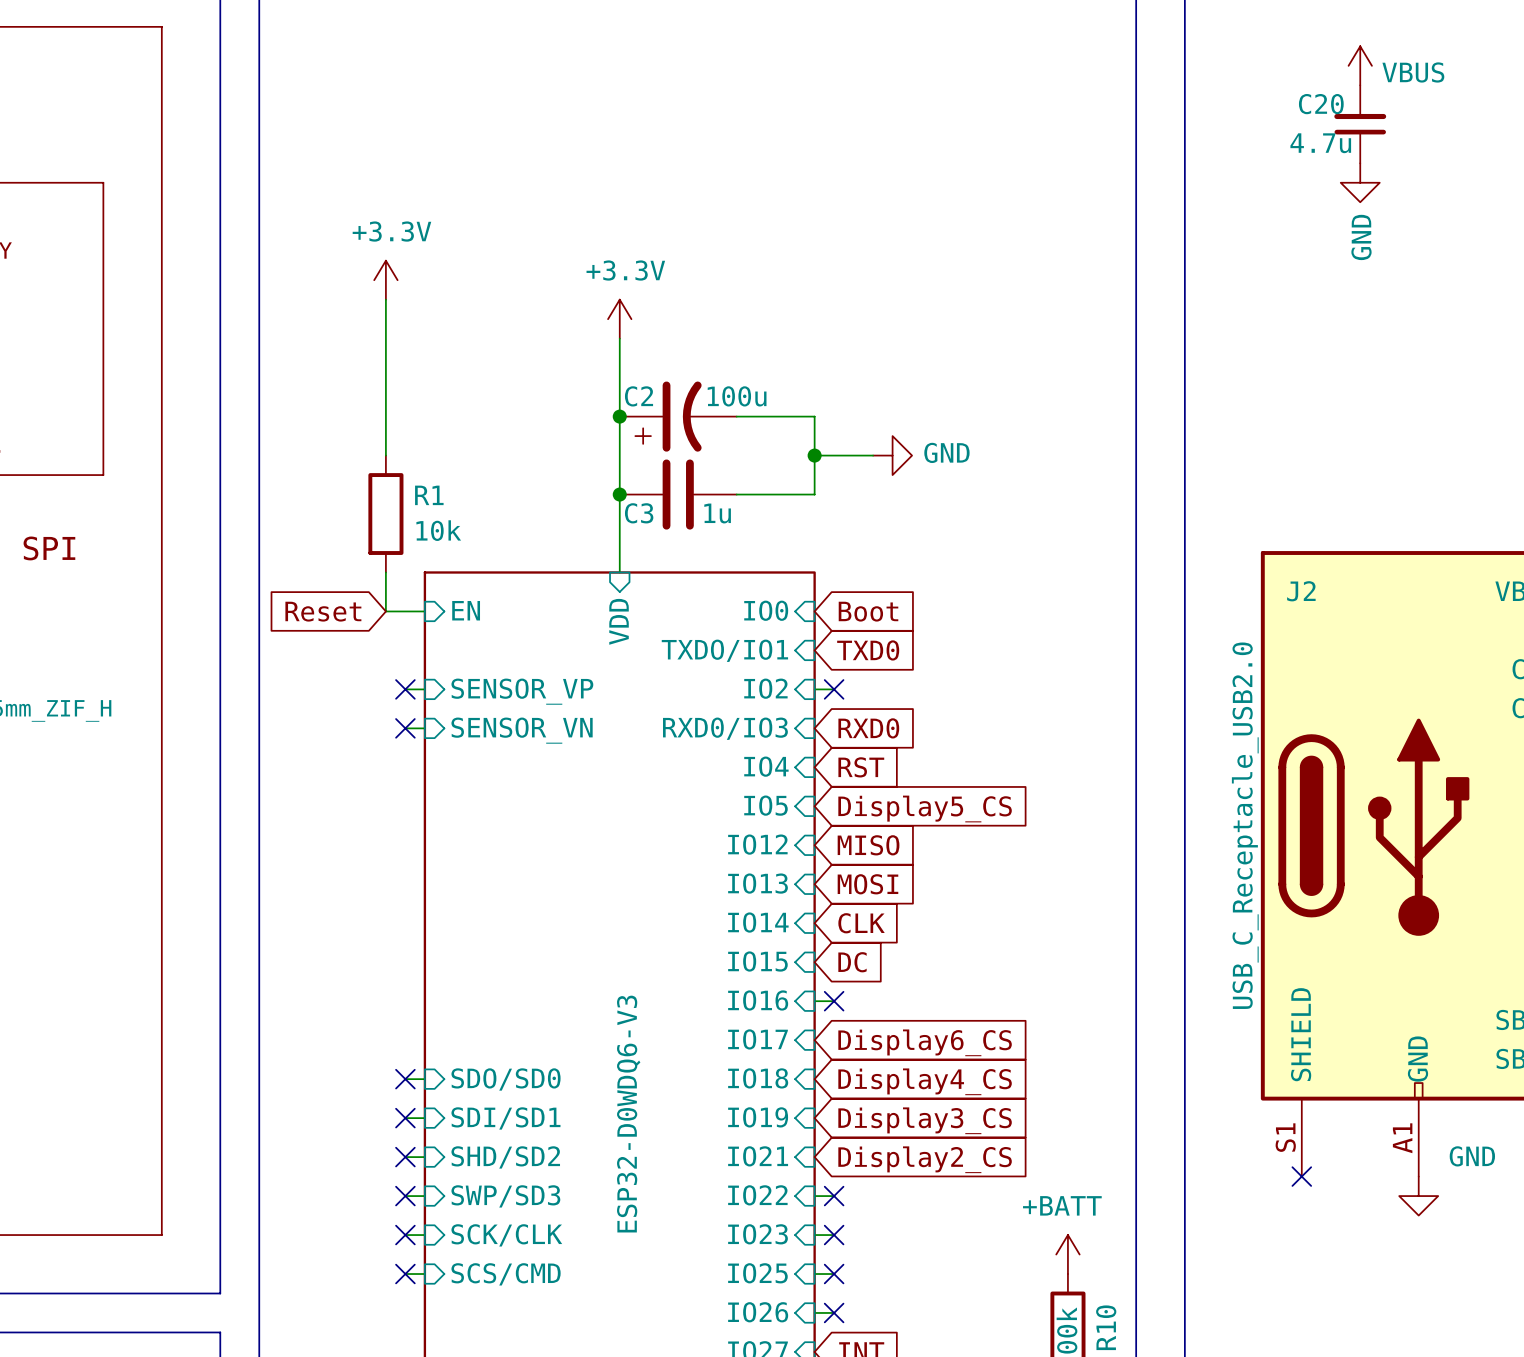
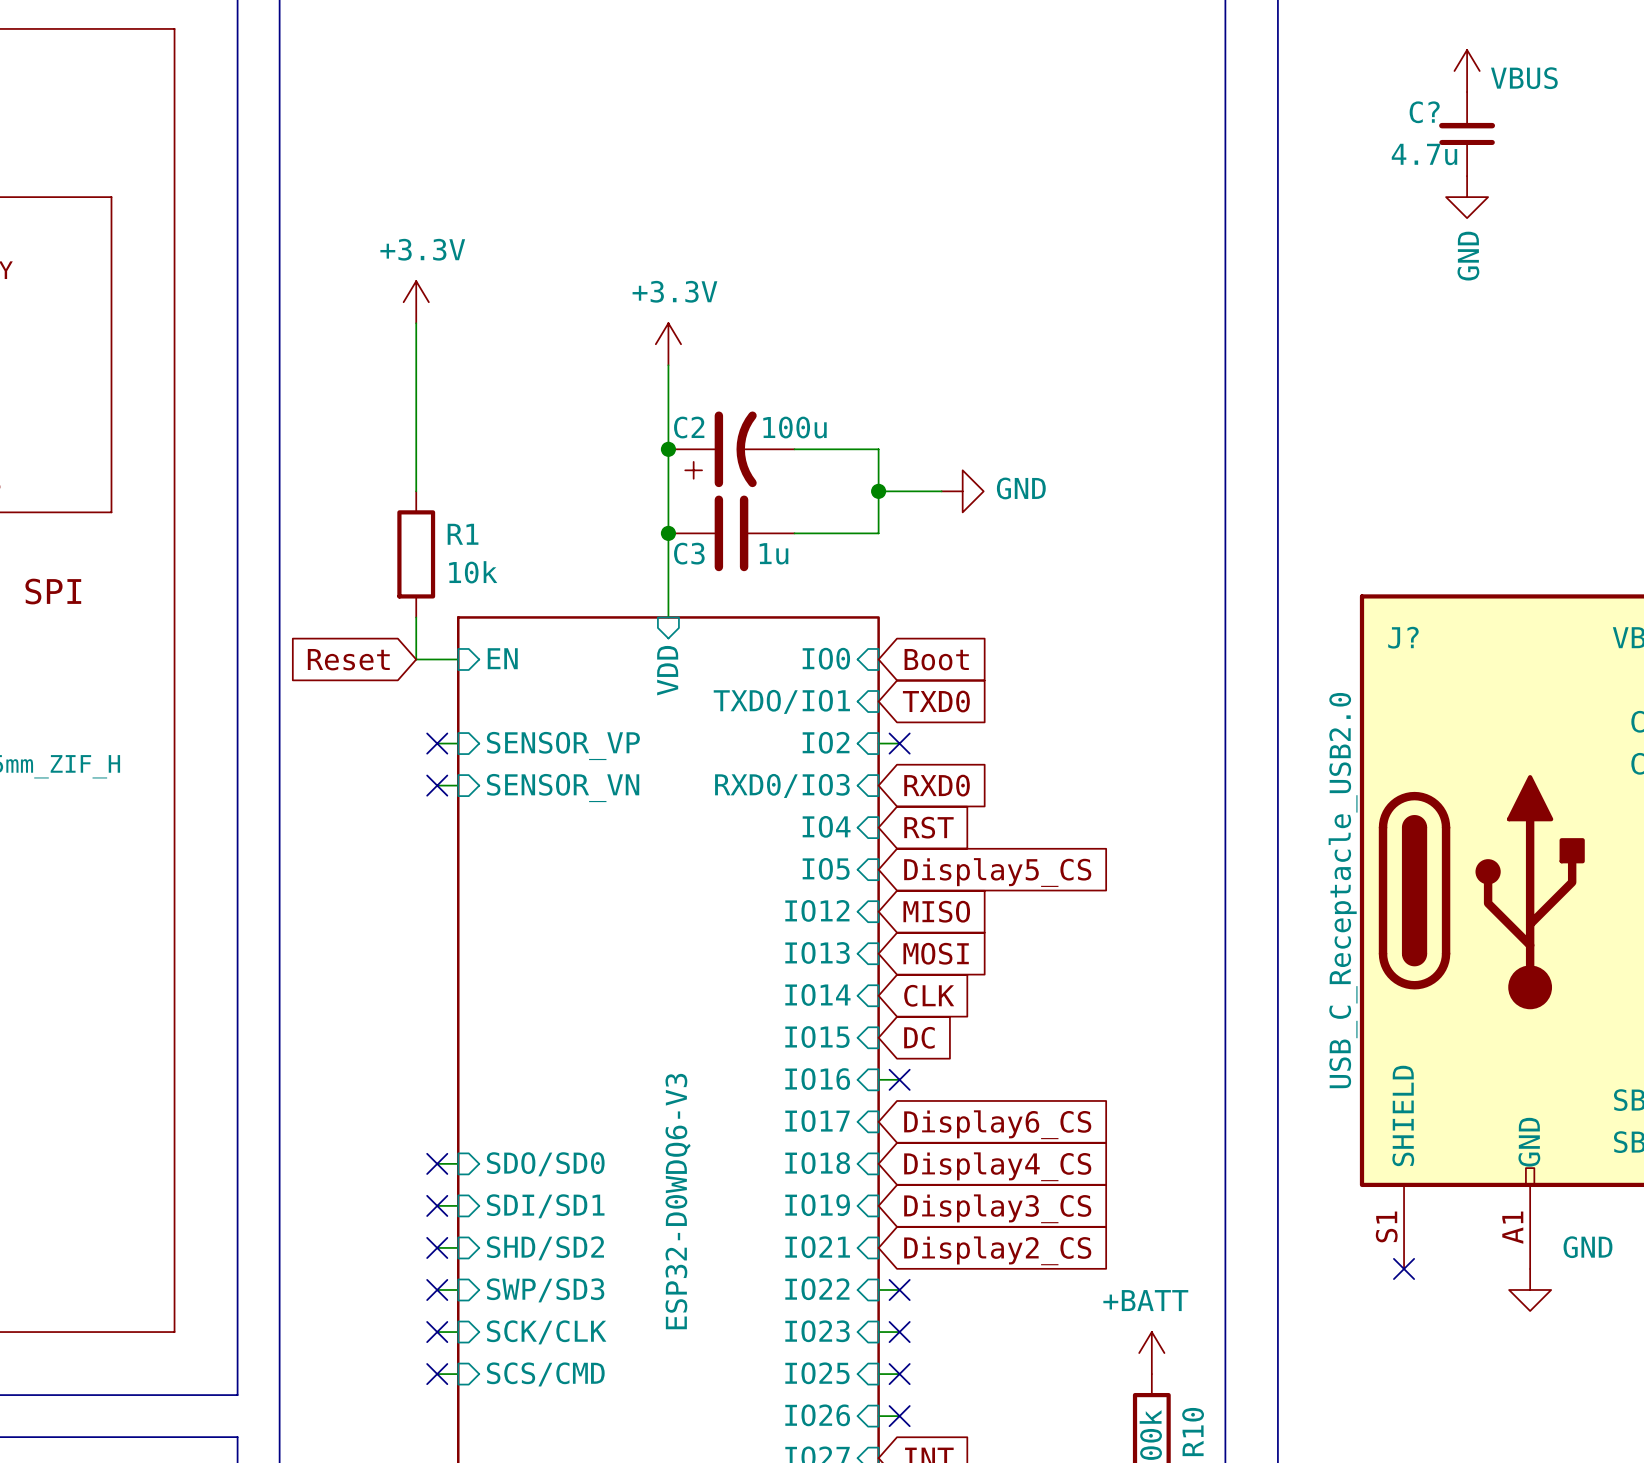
C20 name: C20 (1321, 104) -> C? (1424, 112)
J2 name: J2 (1301, 591) -> J? (1403, 637)

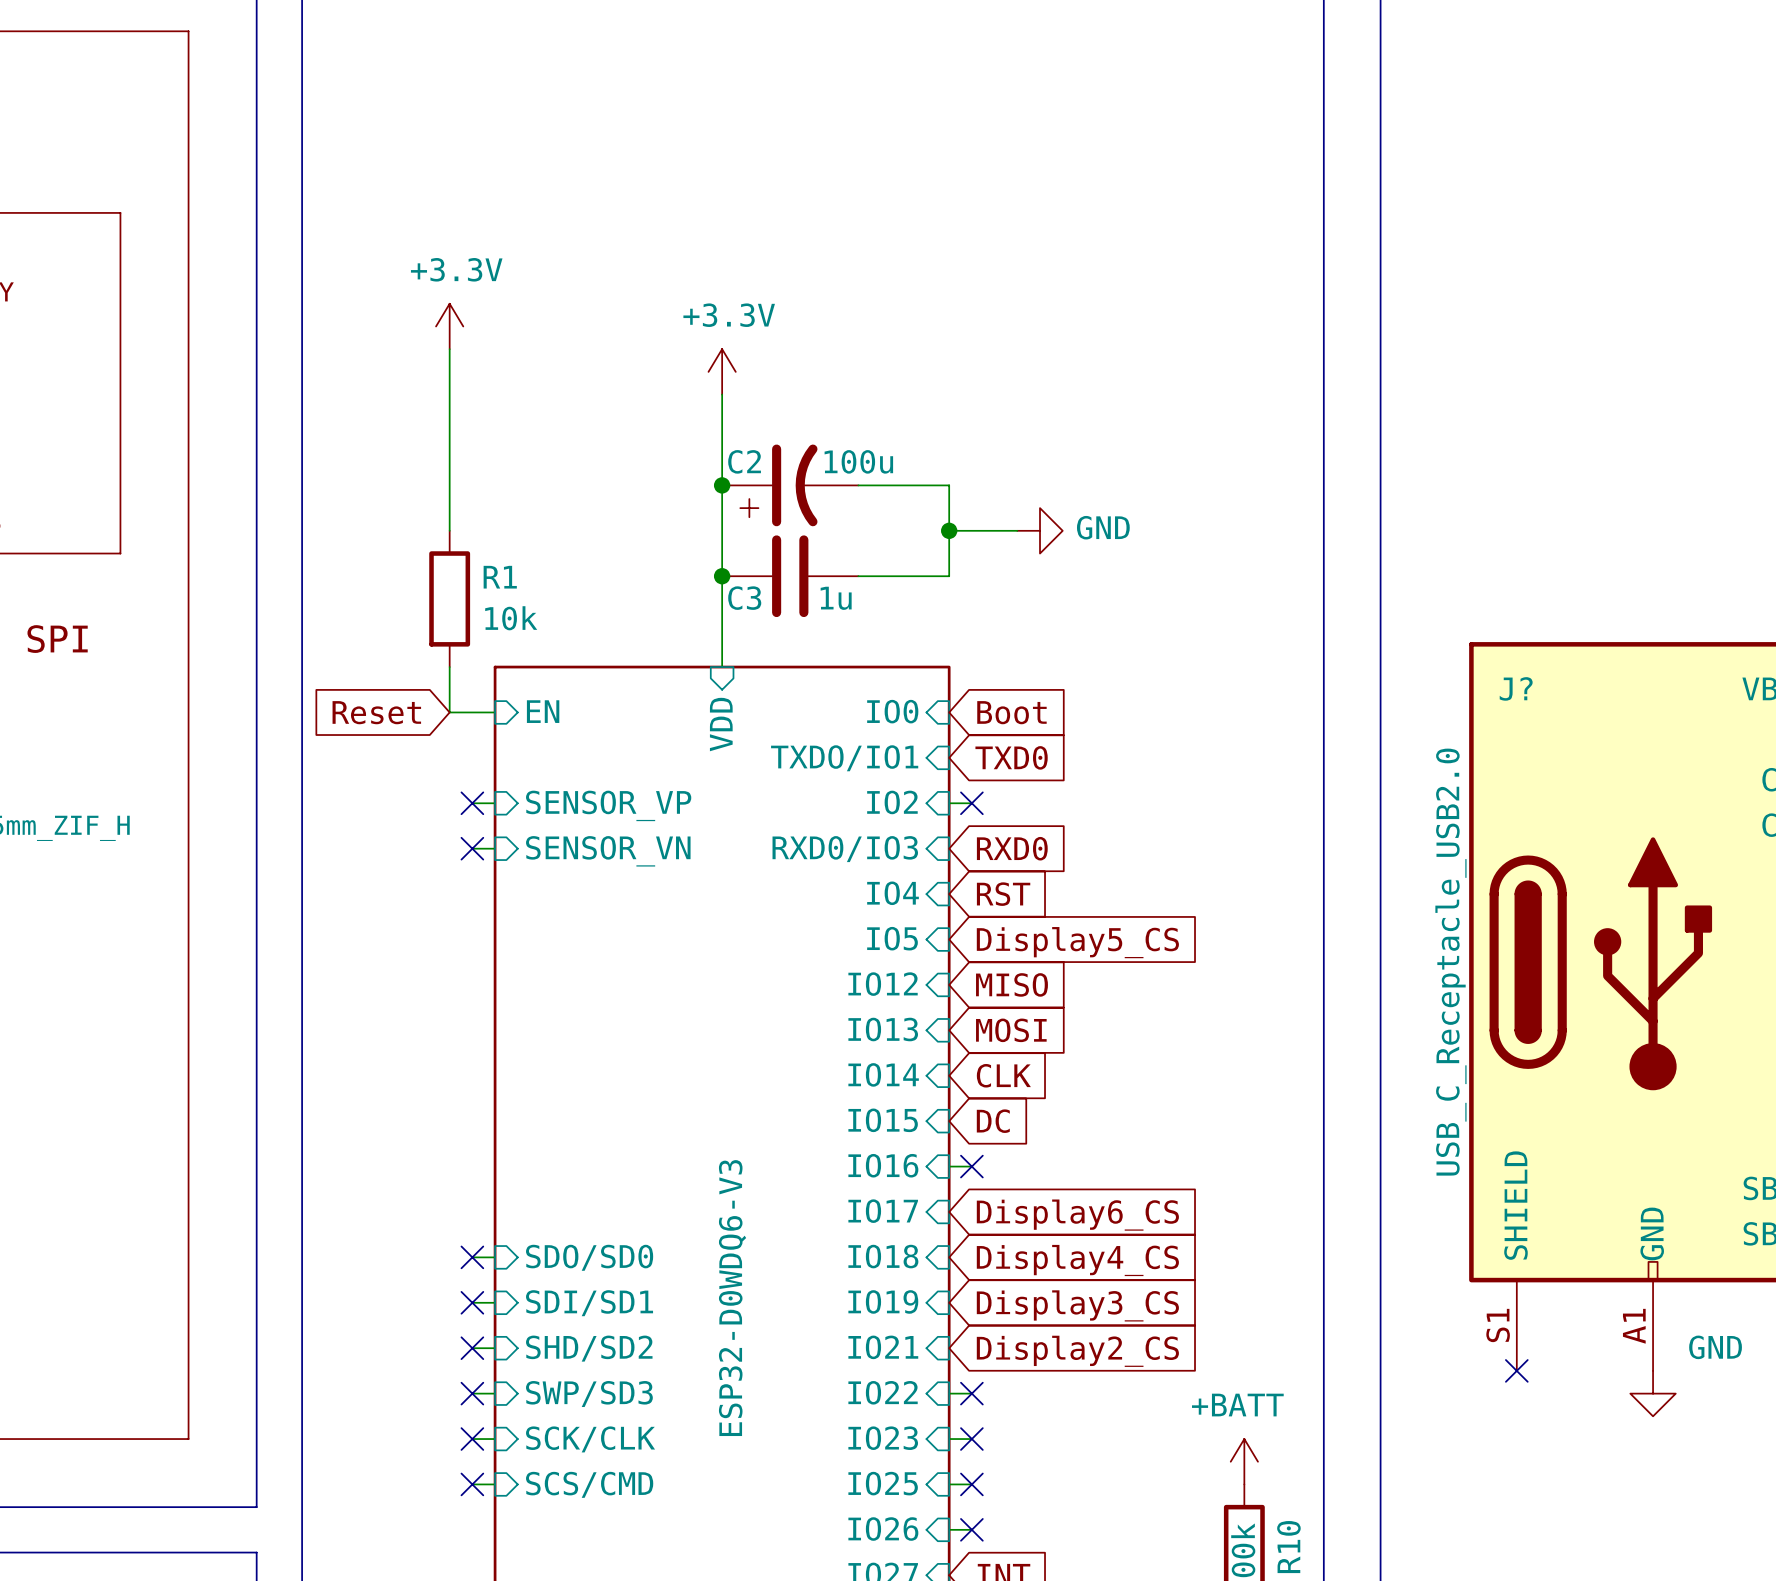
power symbol: VBUS (1467, 71) -> none
C?: 4.7u (1467, 134) -> none
power symbol: GND (1467, 197) -> none

